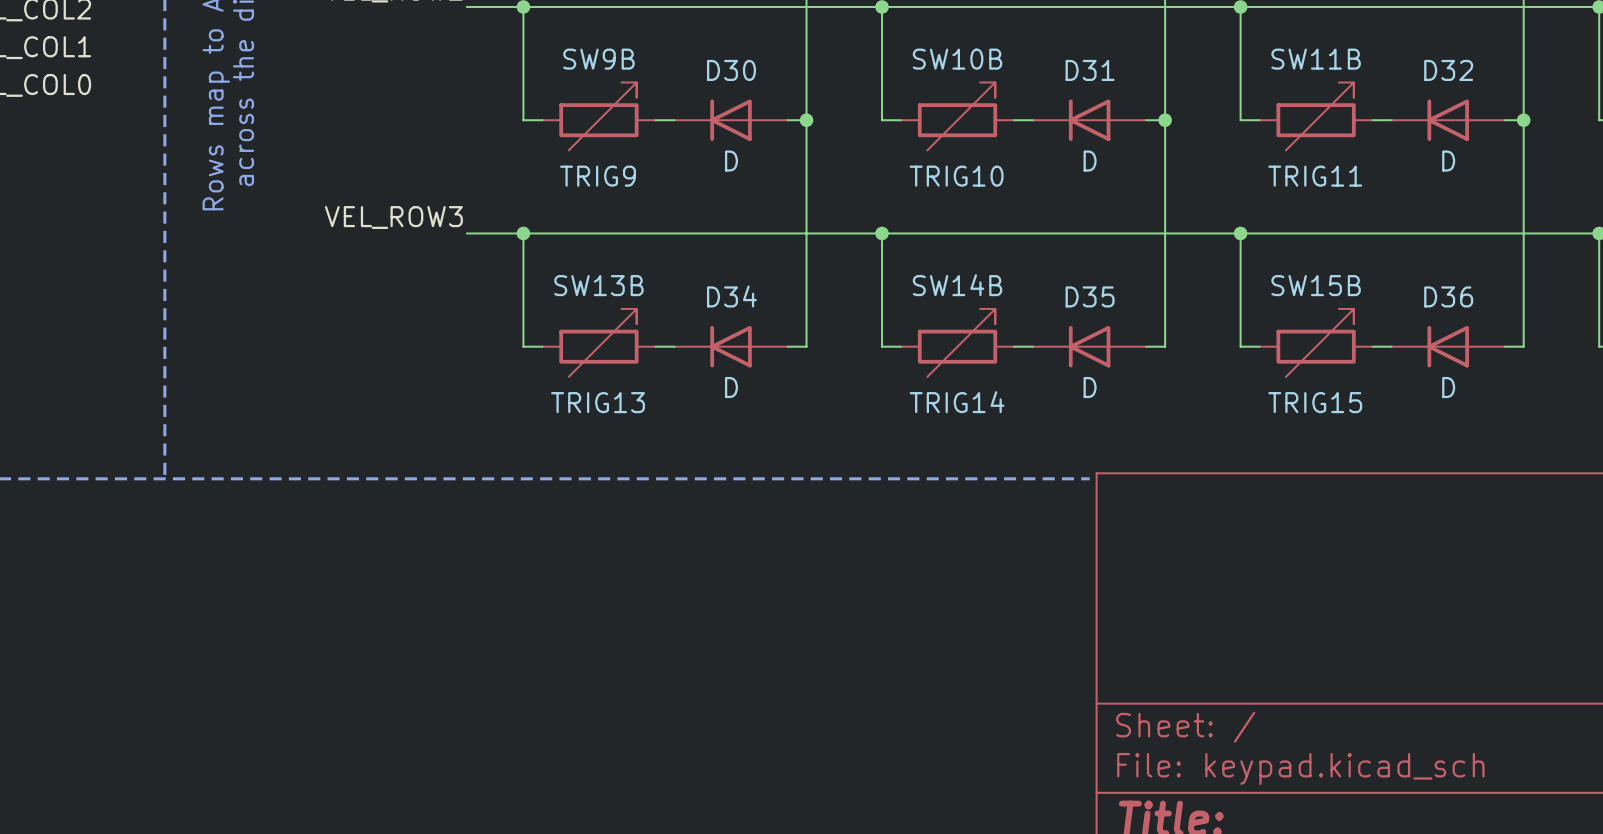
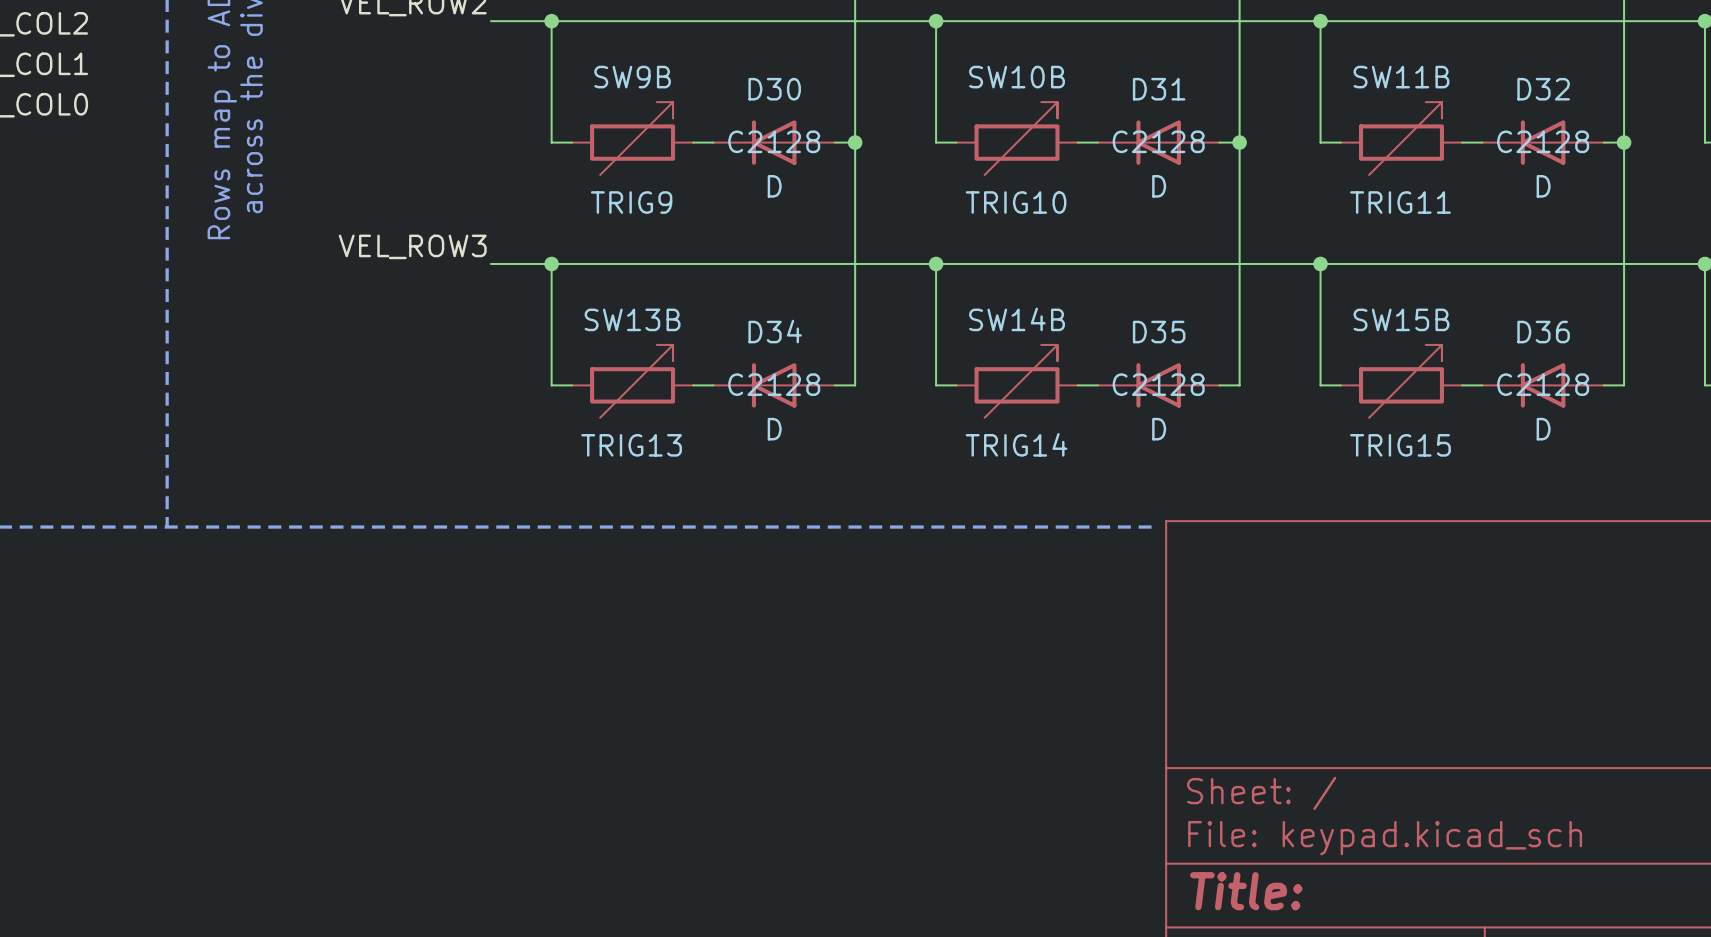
D30 text: none -> C2128 (774, 141)
D31 text: none -> C2128 (1158, 141)
D32 text: none -> C2128 (1543, 141)
D34 text: none -> C2128 (774, 384)
D35 text: none -> C2128 (1158, 384)
D36 text: none -> C2128 (1543, 384)

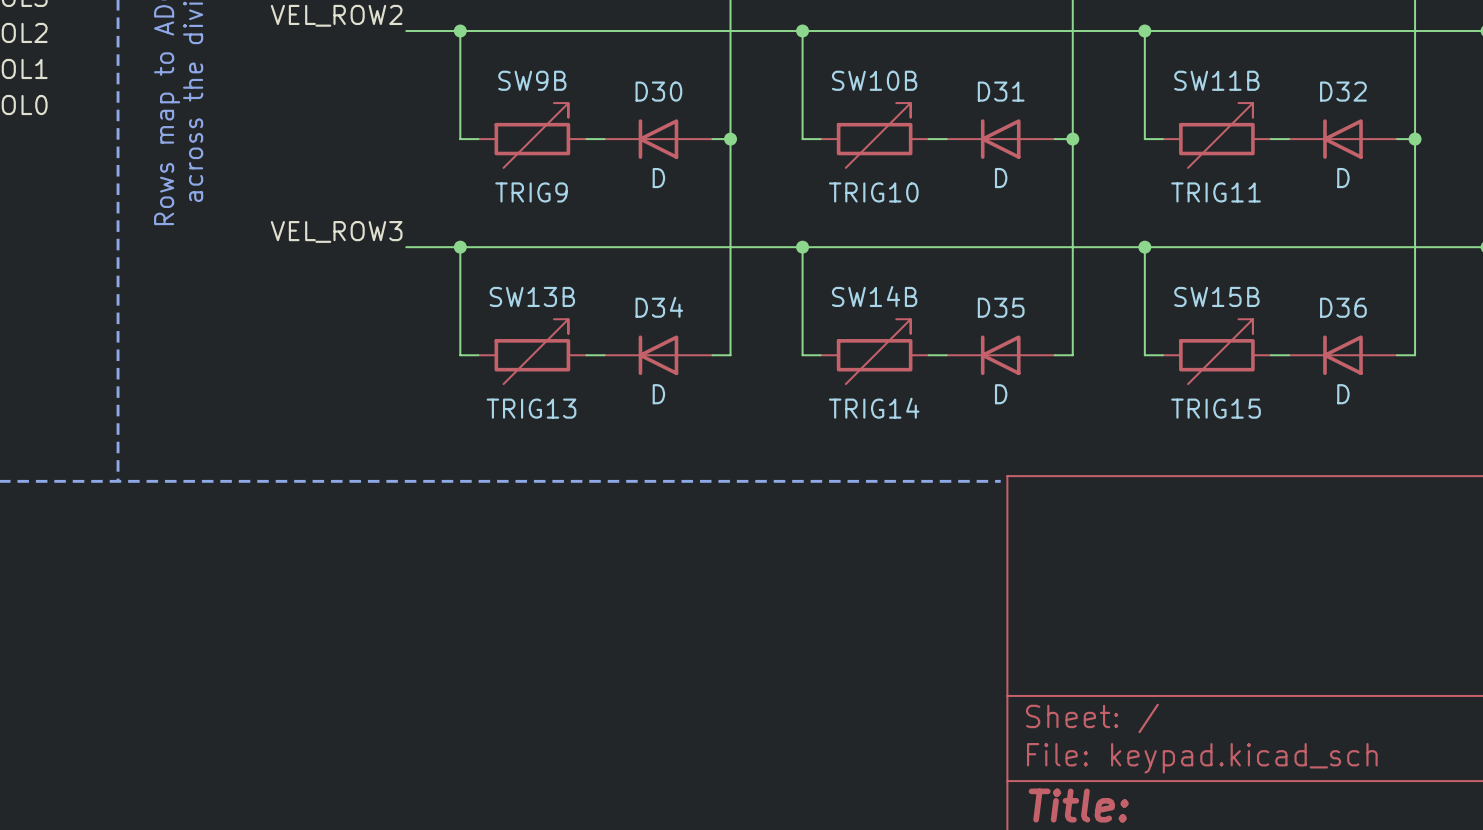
D30 text: C2128 (774, 141) -> none
D31 text: C2128 (1158, 141) -> none
D32 text: C2128 (1543, 141) -> none
D34 text: C2128 (774, 384) -> none
D35 text: C2128 (1158, 384) -> none
D36 text: C2128 (1543, 384) -> none

